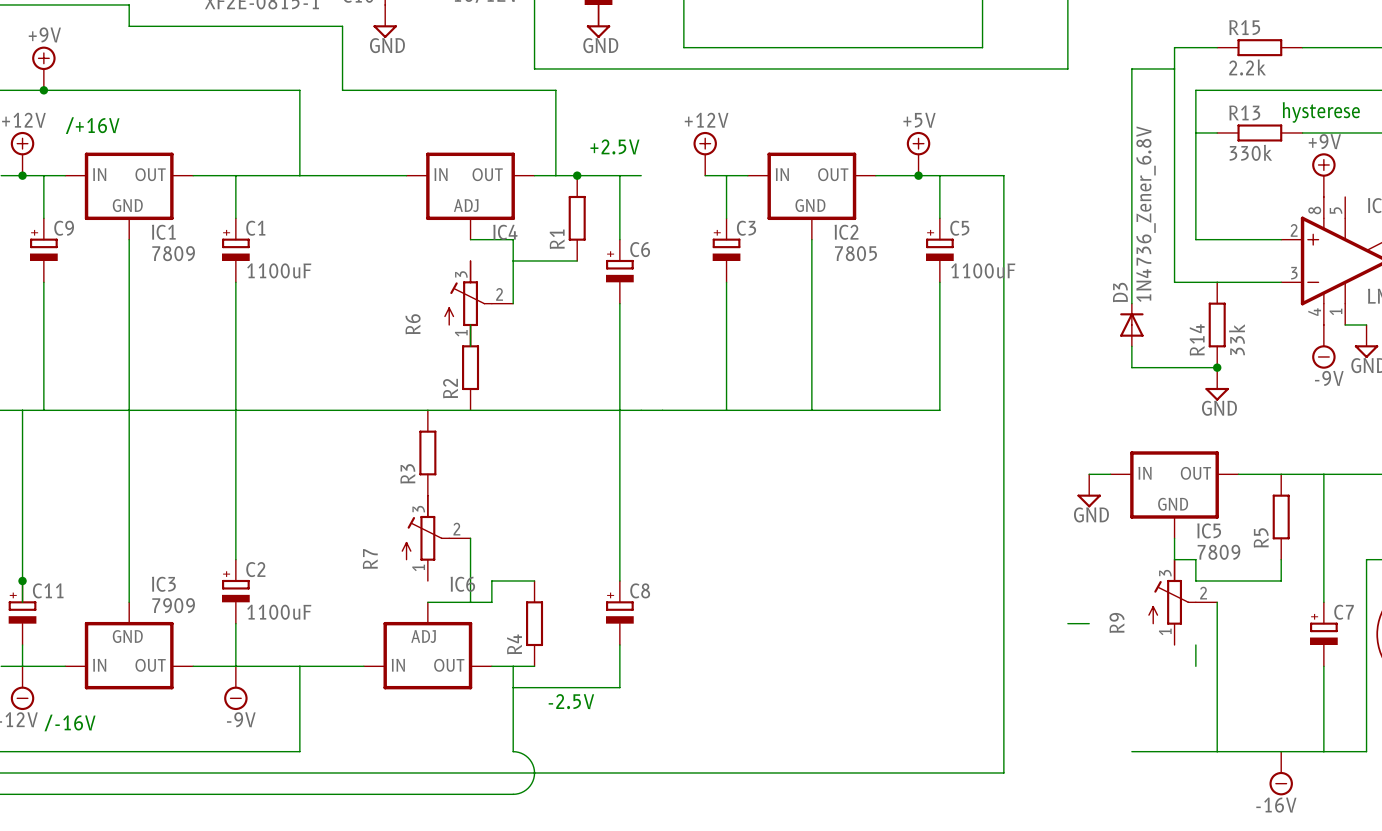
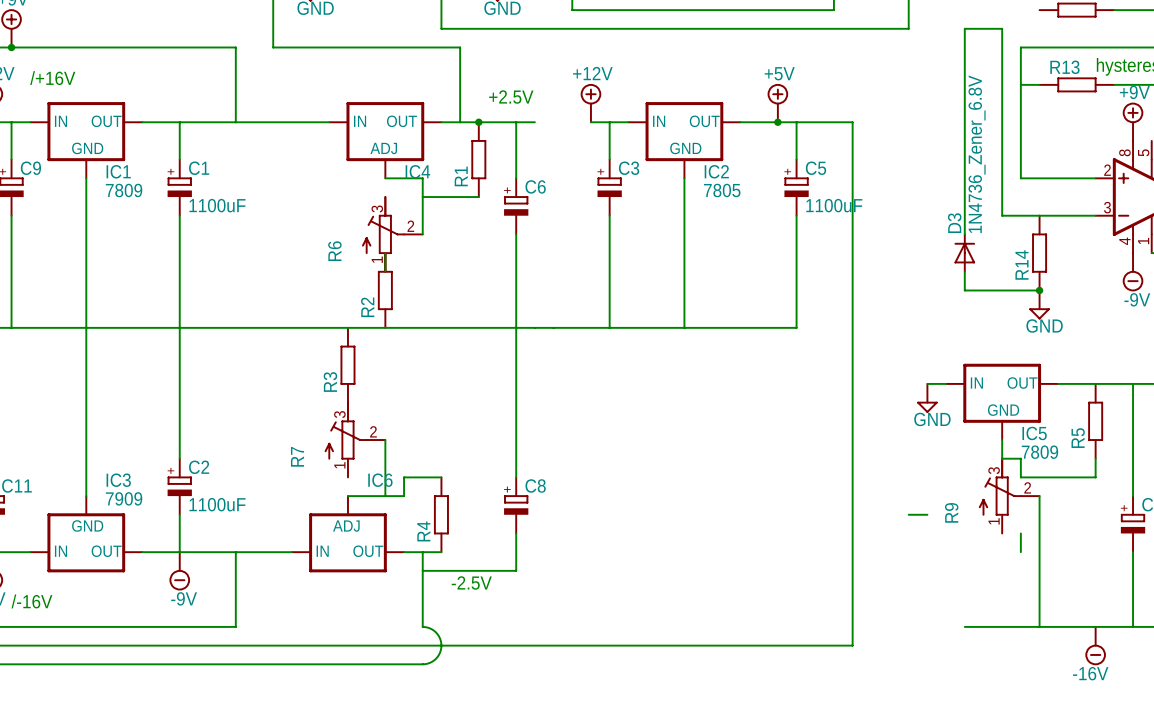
wire: (1217, 47) (1174, 47) (1174, 68) -> none
R15 value: 2.2k (1247, 67) -> none
R13 value: 330k (1250, 152) -> none
R14 value: 33k (1236, 339) -> none

